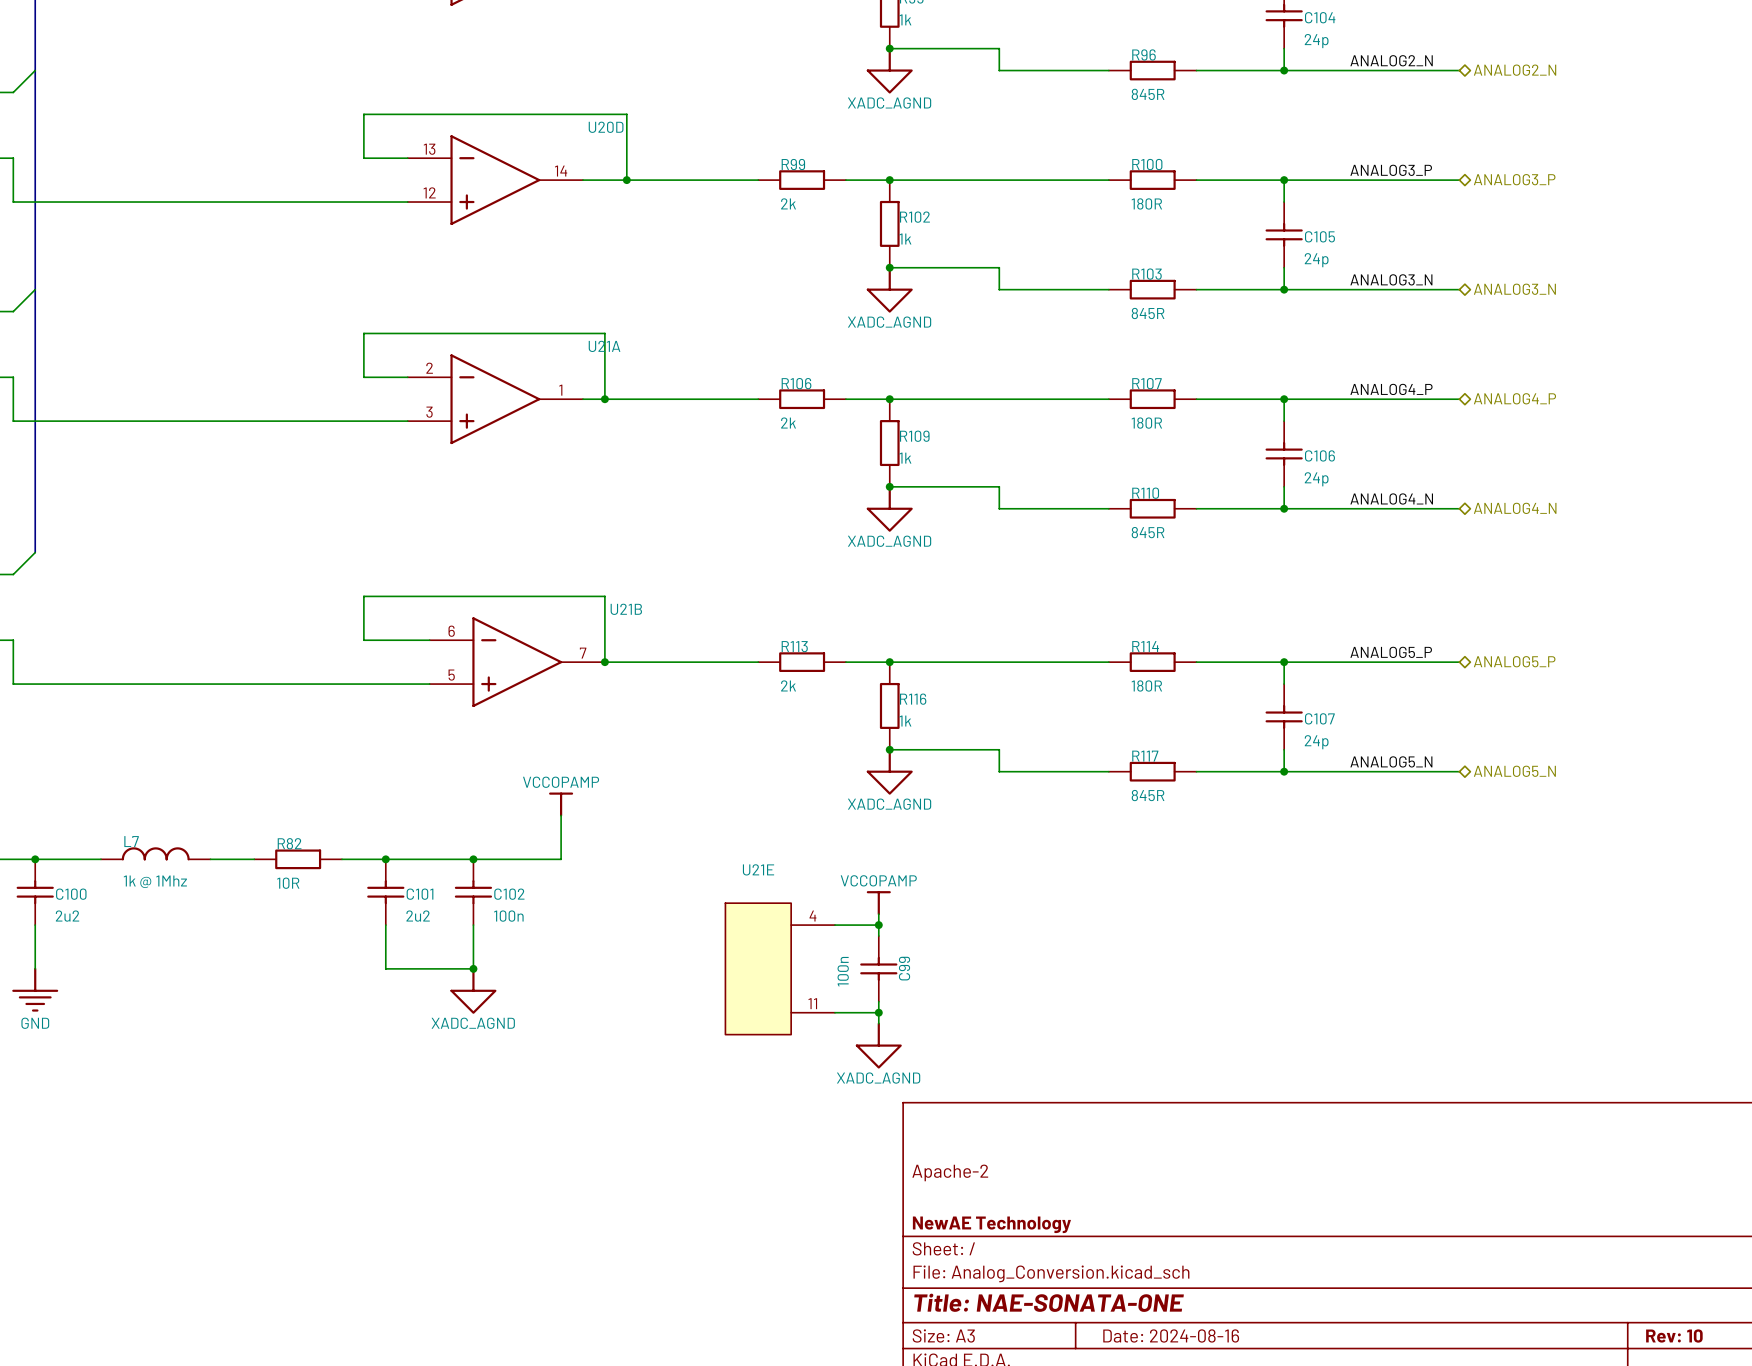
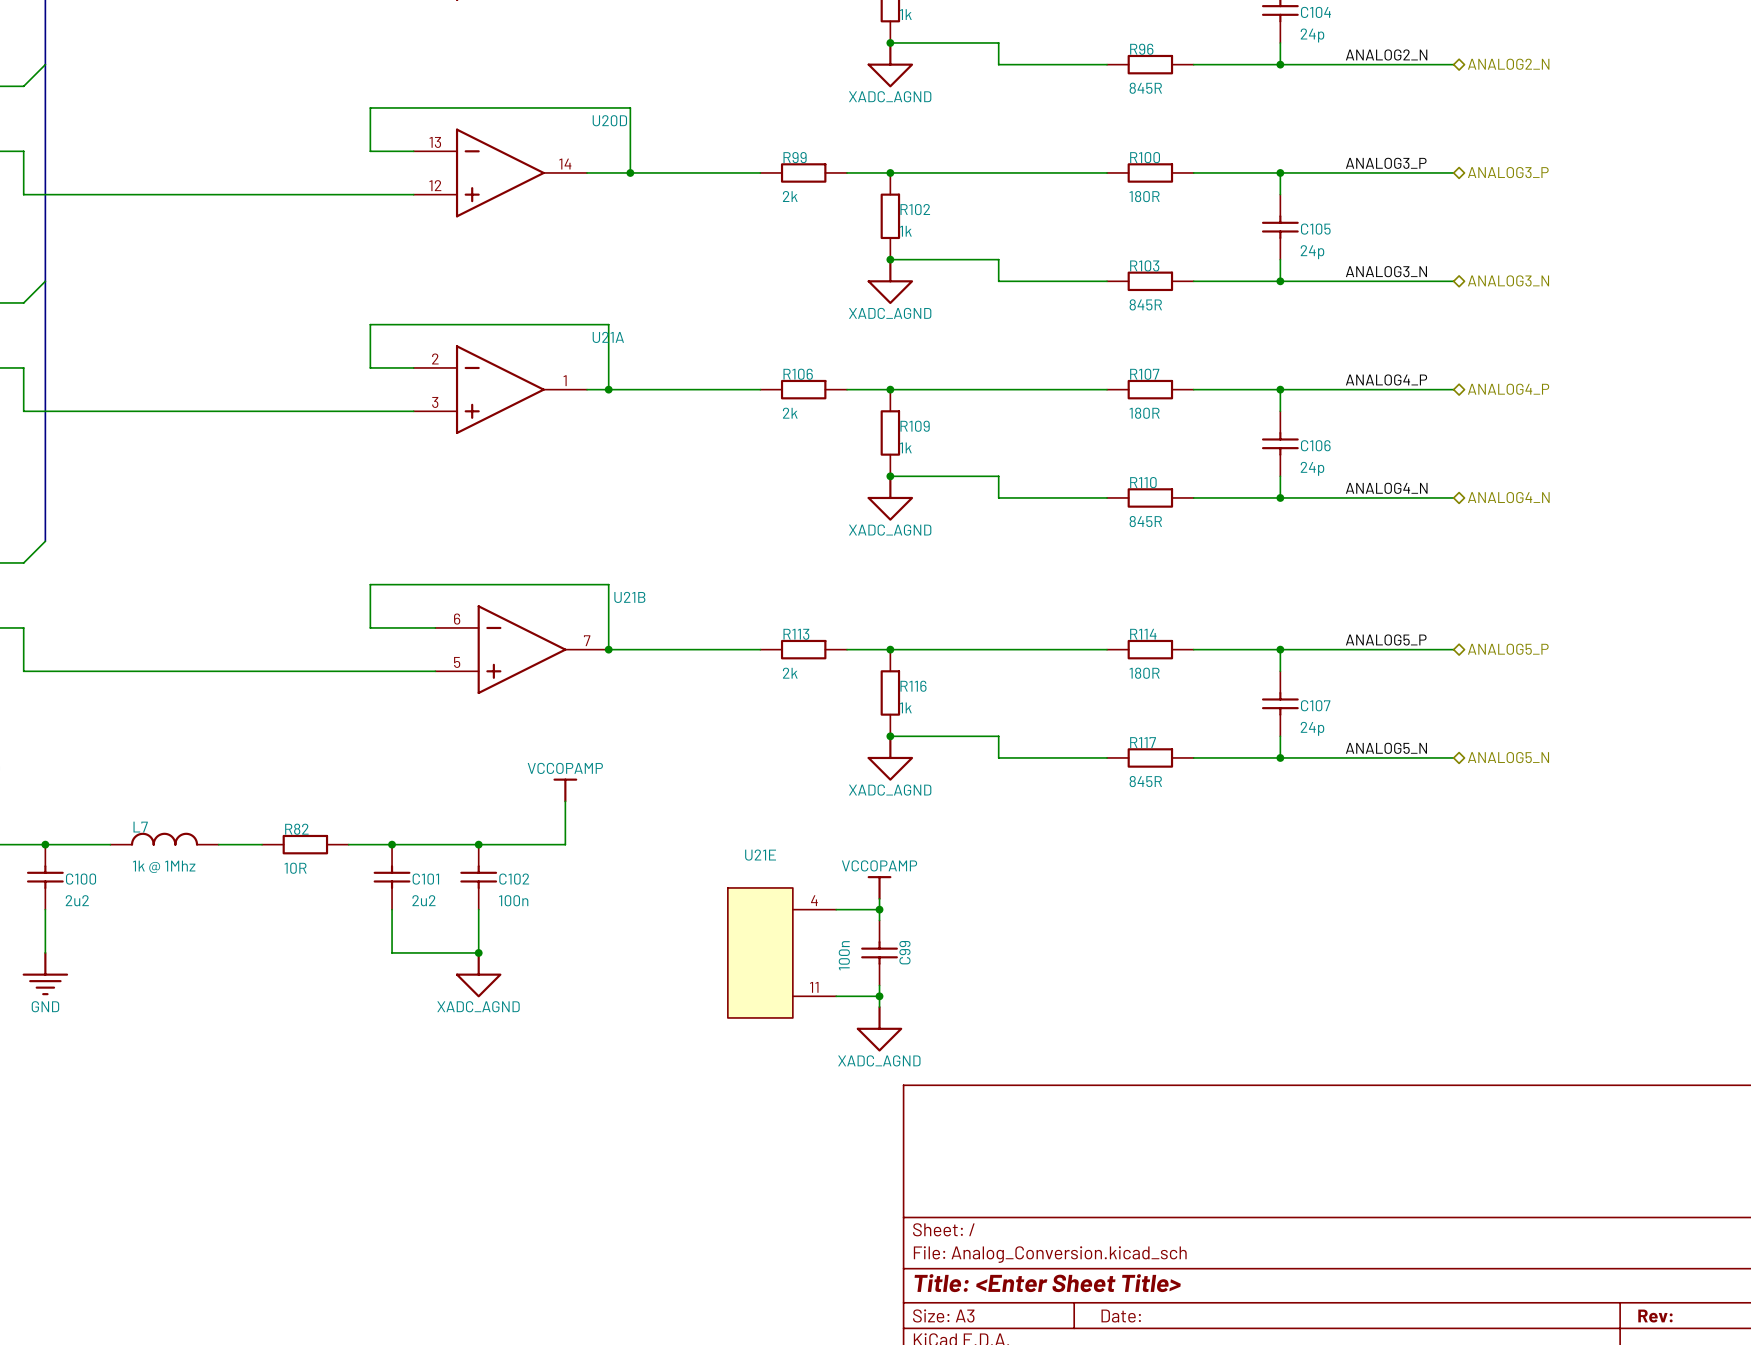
title block: Apache-2 (950, 1172) -> none
title block: NewAE Technology (991, 1224) -> none
title block: Title: NAE-SONATA-ONE (1049, 1302) -> Title: <Enter Sheet Title> (1047, 1283)
title block: Date: 2024-08-16 (1171, 1335) -> Date: (1121, 1316)
title block: Rev: 10 (1674, 1336) -> Rev: (1655, 1316)

